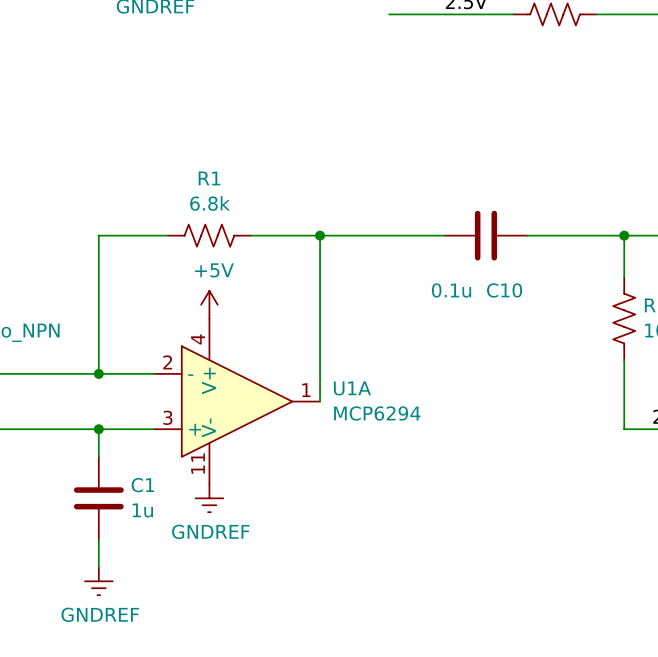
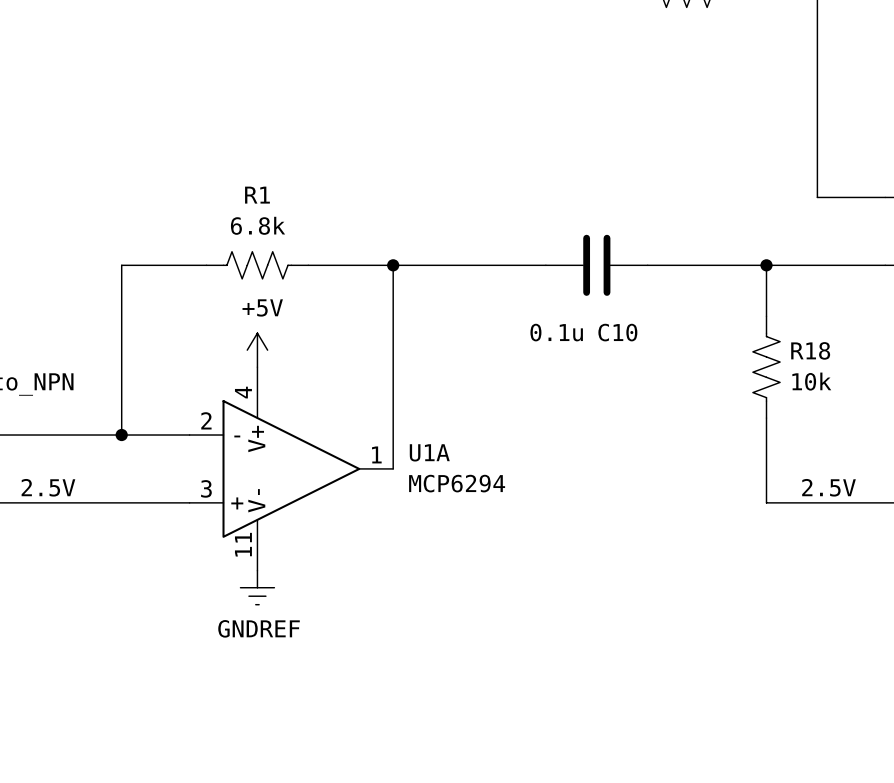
label: none -> 2.5V (48, 487)
wire: (98, 429) (98, 456) -> none
junction: (98, 429) -> none
C1: 1u (98, 498) -> none
wire: (98, 539) (98, 567) -> none
power symbol: GNDREF (98, 581) -> none

